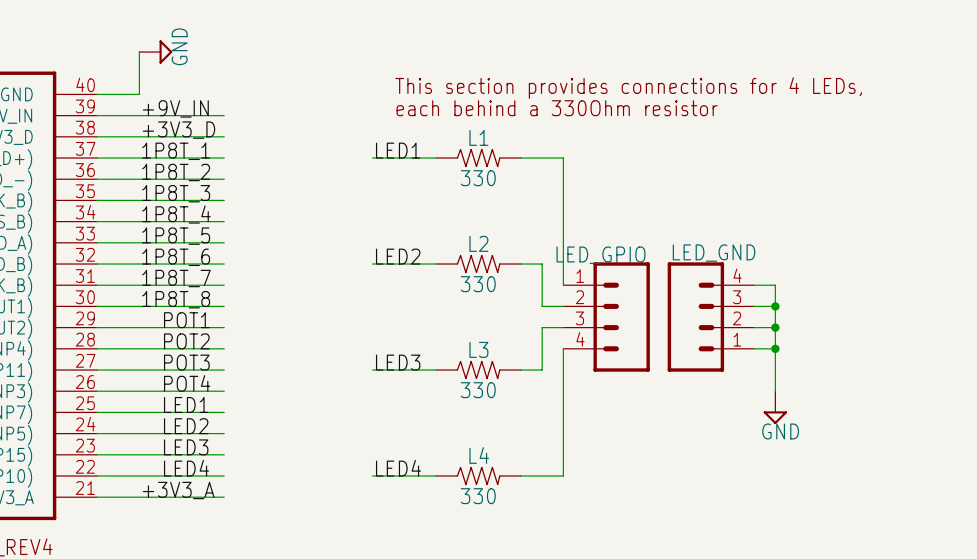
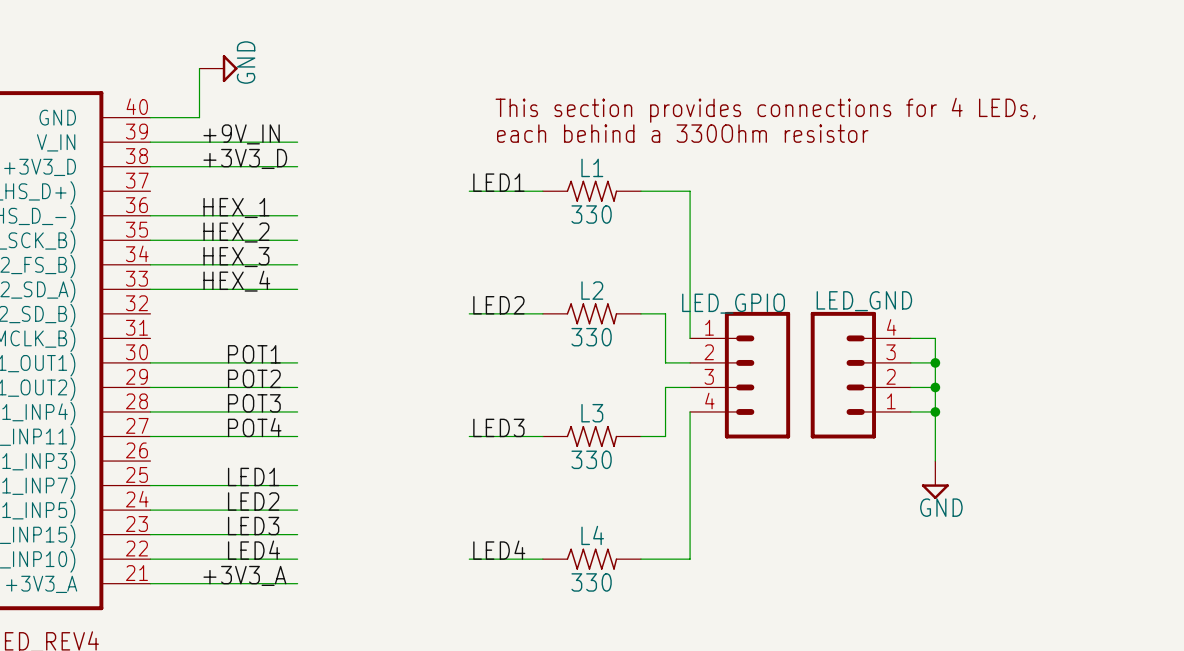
label: 1P8T_1 (176, 151) -> none
wire: (97, 158) (224, 158) -> none
label: 1P8T_2 (176, 172) -> HEX_1 (236, 207)
label: 1P8T_3 (176, 193) -> HEX_2 (236, 232)
label: 1P8T_4 (176, 214) -> HEX_3 (236, 257)
label: 1P8T_5 (176, 236) -> HEX_4 (236, 281)
label: 1P8T_6 (176, 257) -> none
wire: (97, 264) (224, 264) -> none
label: 1P8T_7 (176, 278) -> none
wire: (97, 285) (224, 285) -> none
label: none -> POT1 (254, 354)
label: 1P8T_8 (176, 299) -> none
label: POT1 (186, 320) -> POT2 (254, 378)
label: POT2 (186, 341) -> POT3 (254, 403)
label: POT3 (186, 362) -> POT4 (254, 427)
label: POT4 (187, 383) -> none
wire: (97, 391) (224, 391) -> none

